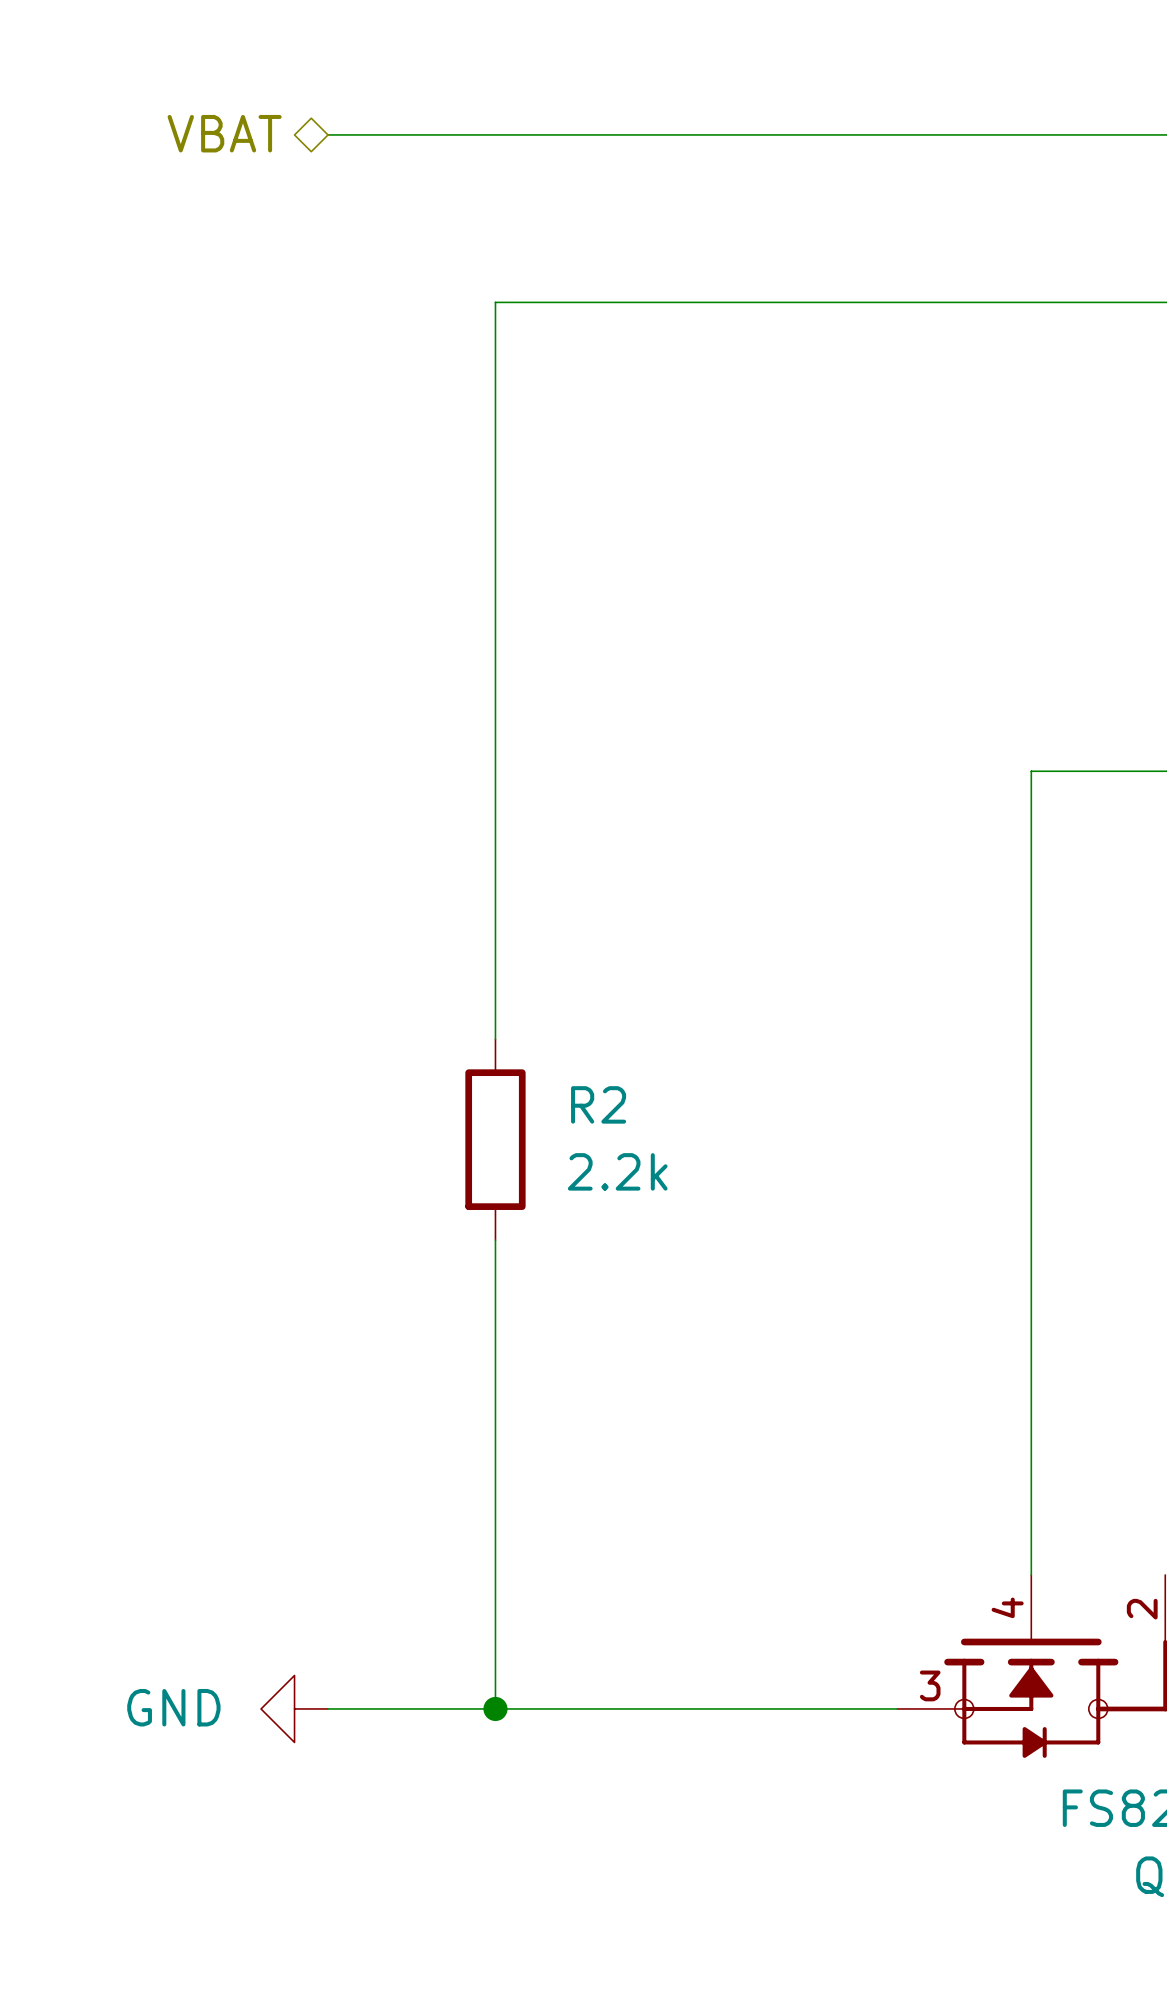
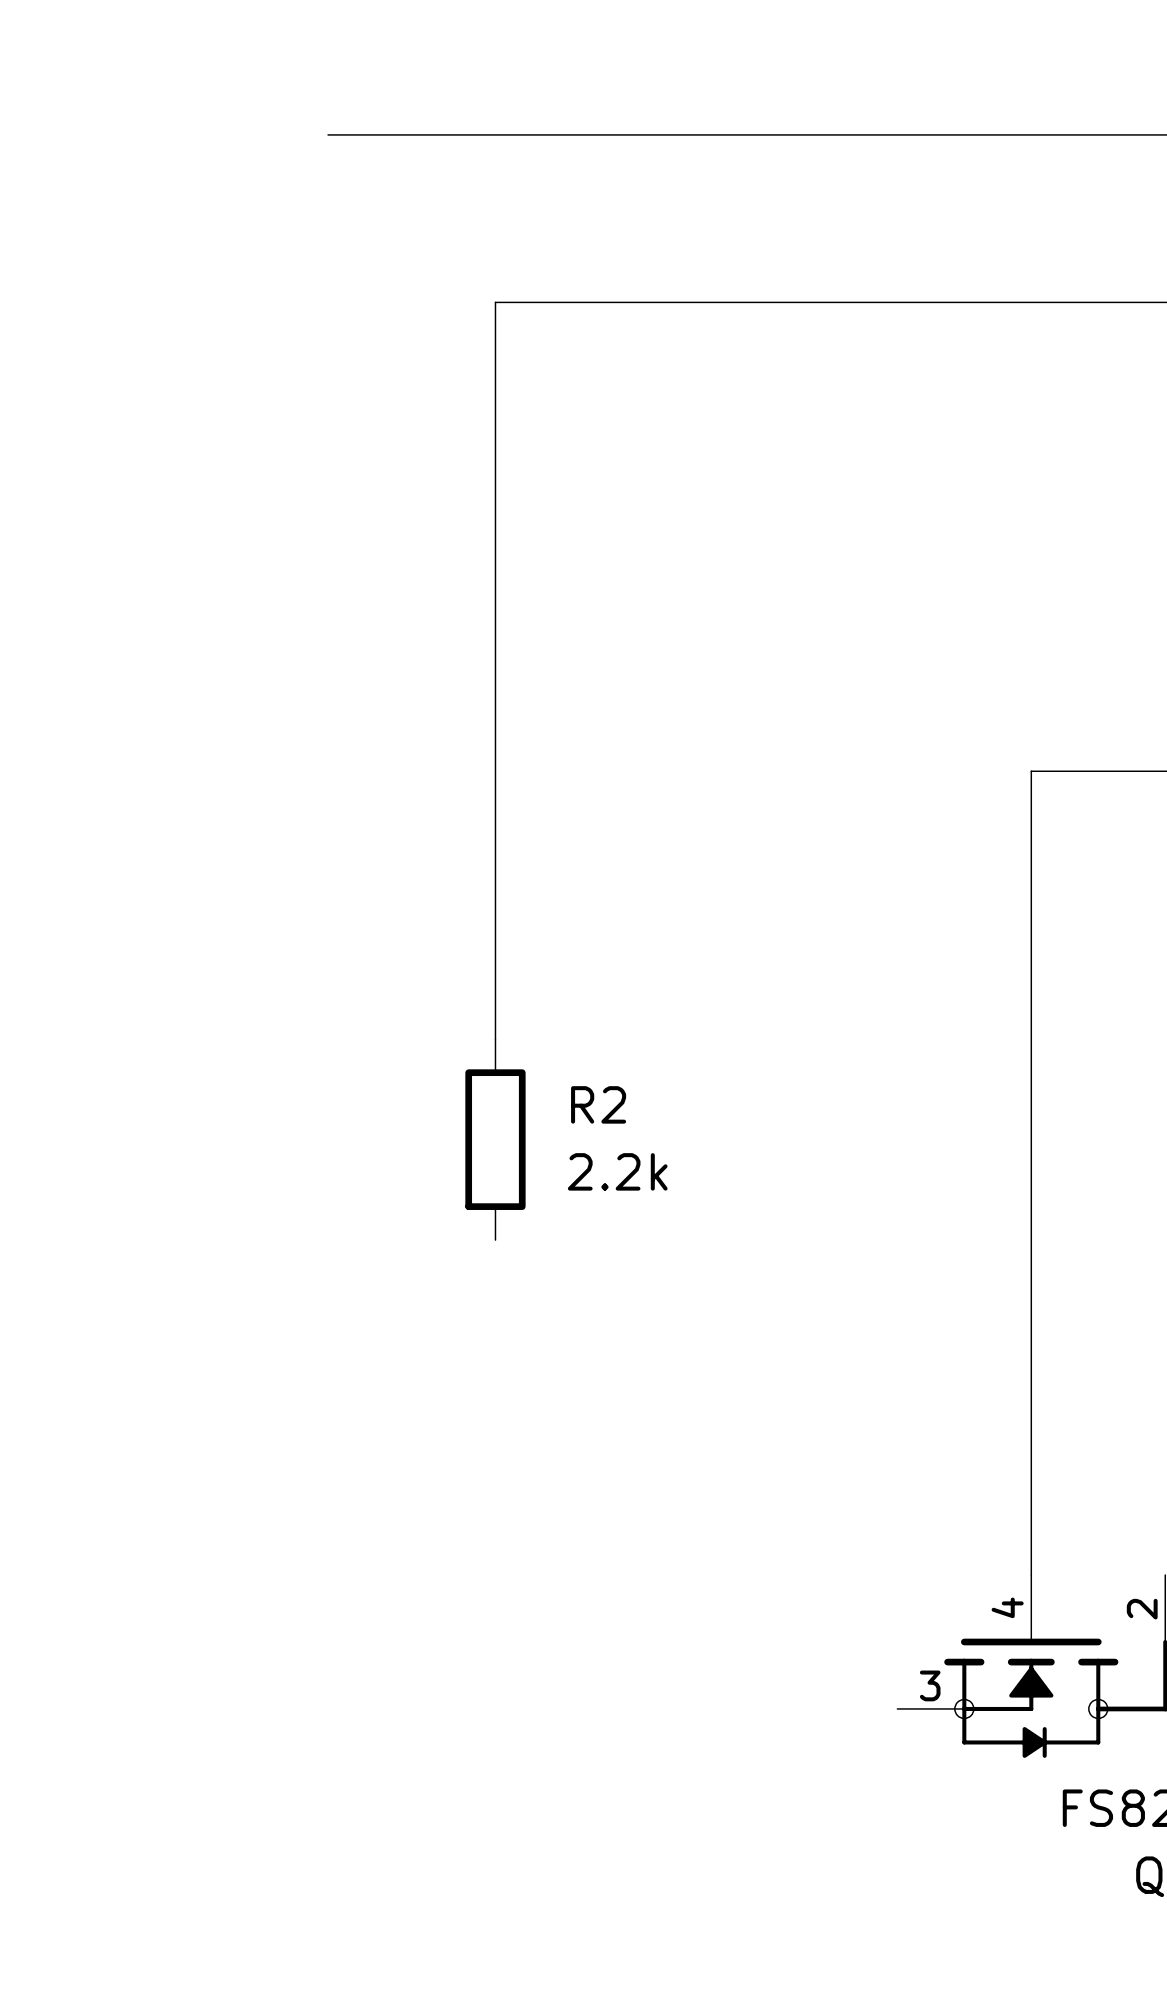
hierarchical label: VBAT (224, 133) -> none
wire: (495, 1240) (495, 1708) -> none
power symbol: GND (294, 1708) -> none
wire: (328, 1708) (897, 1708) -> none
junction: (495, 1708) -> none

